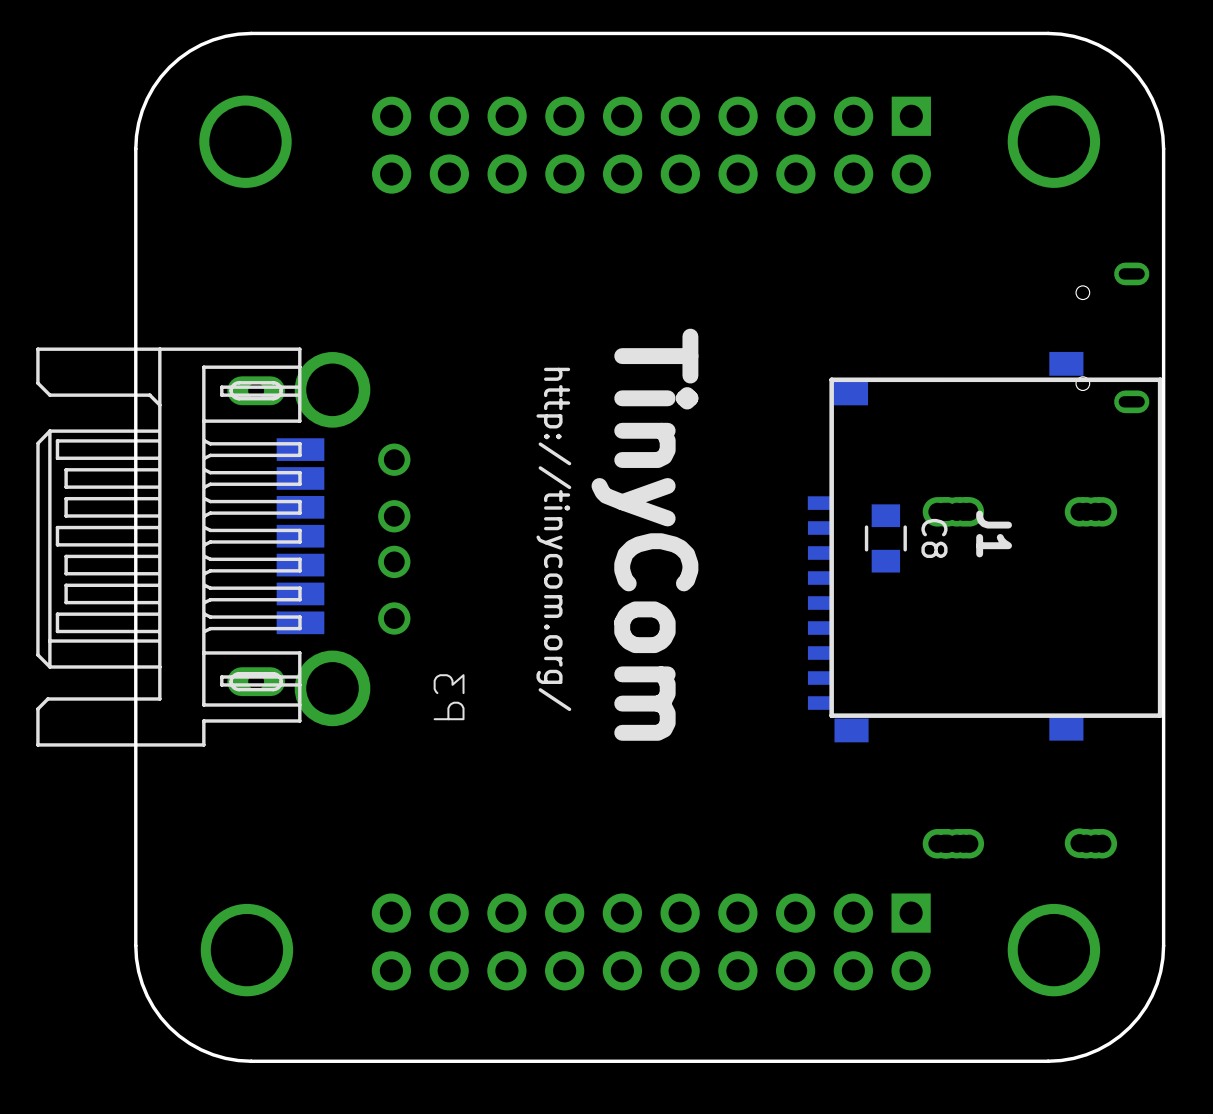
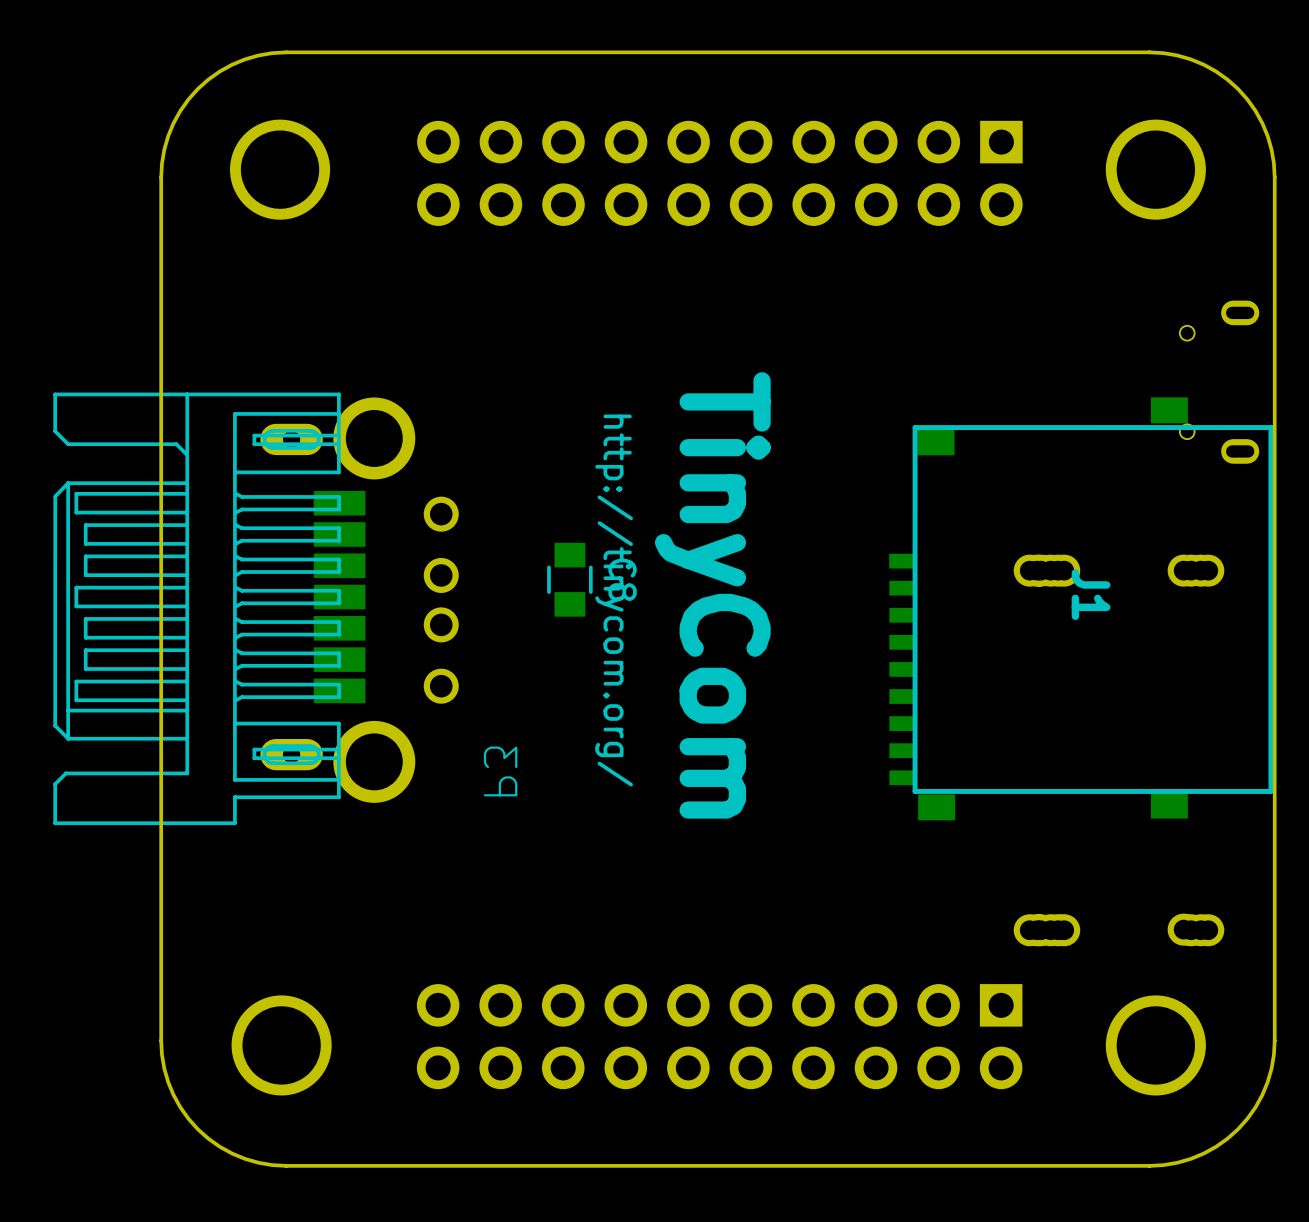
C8 position: (885, 538) -> (569, 579)

